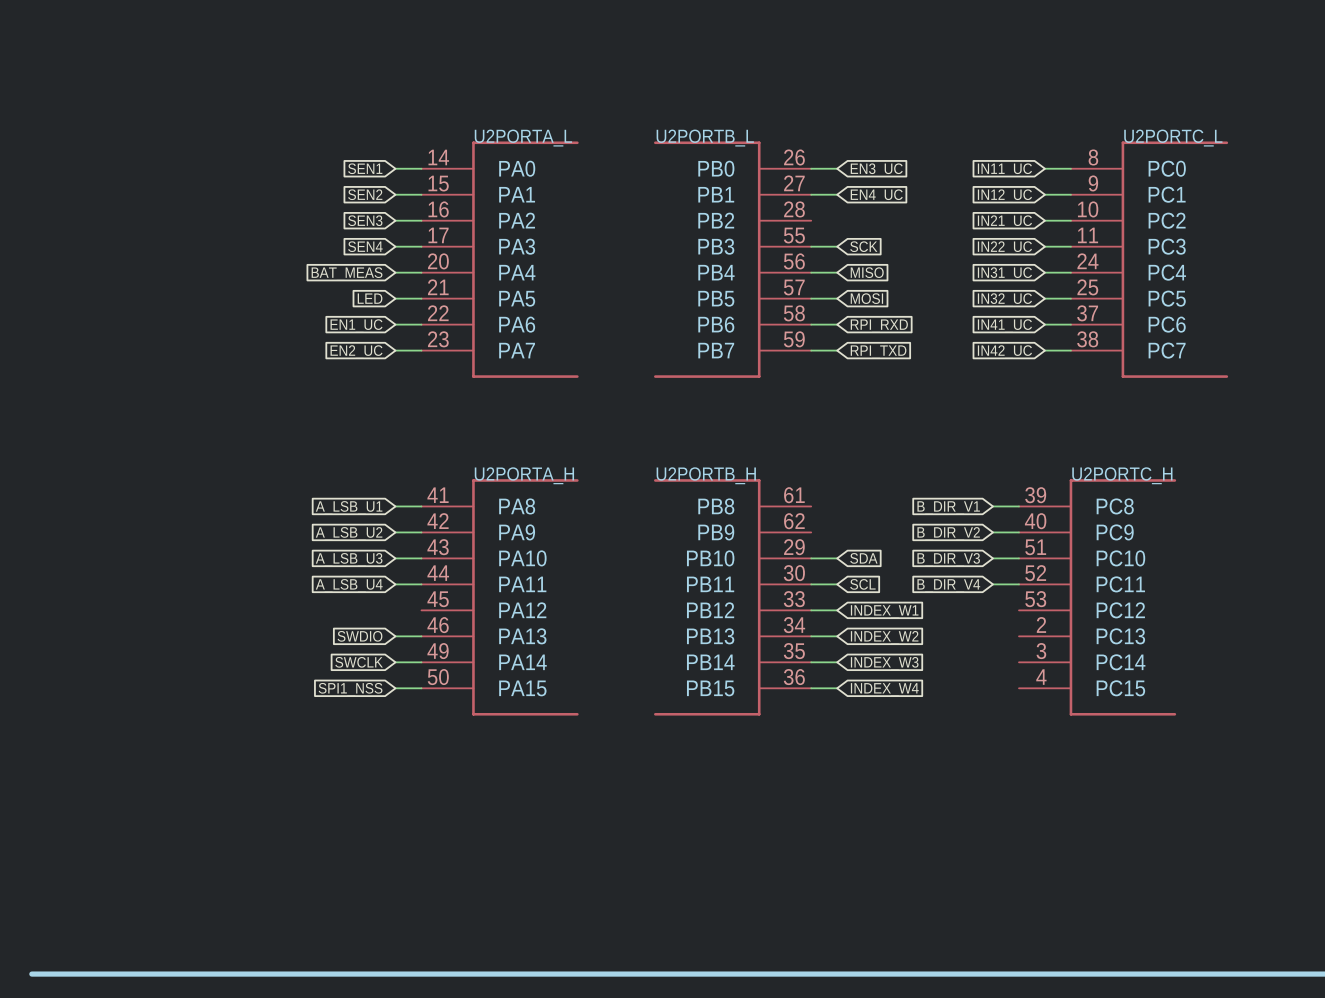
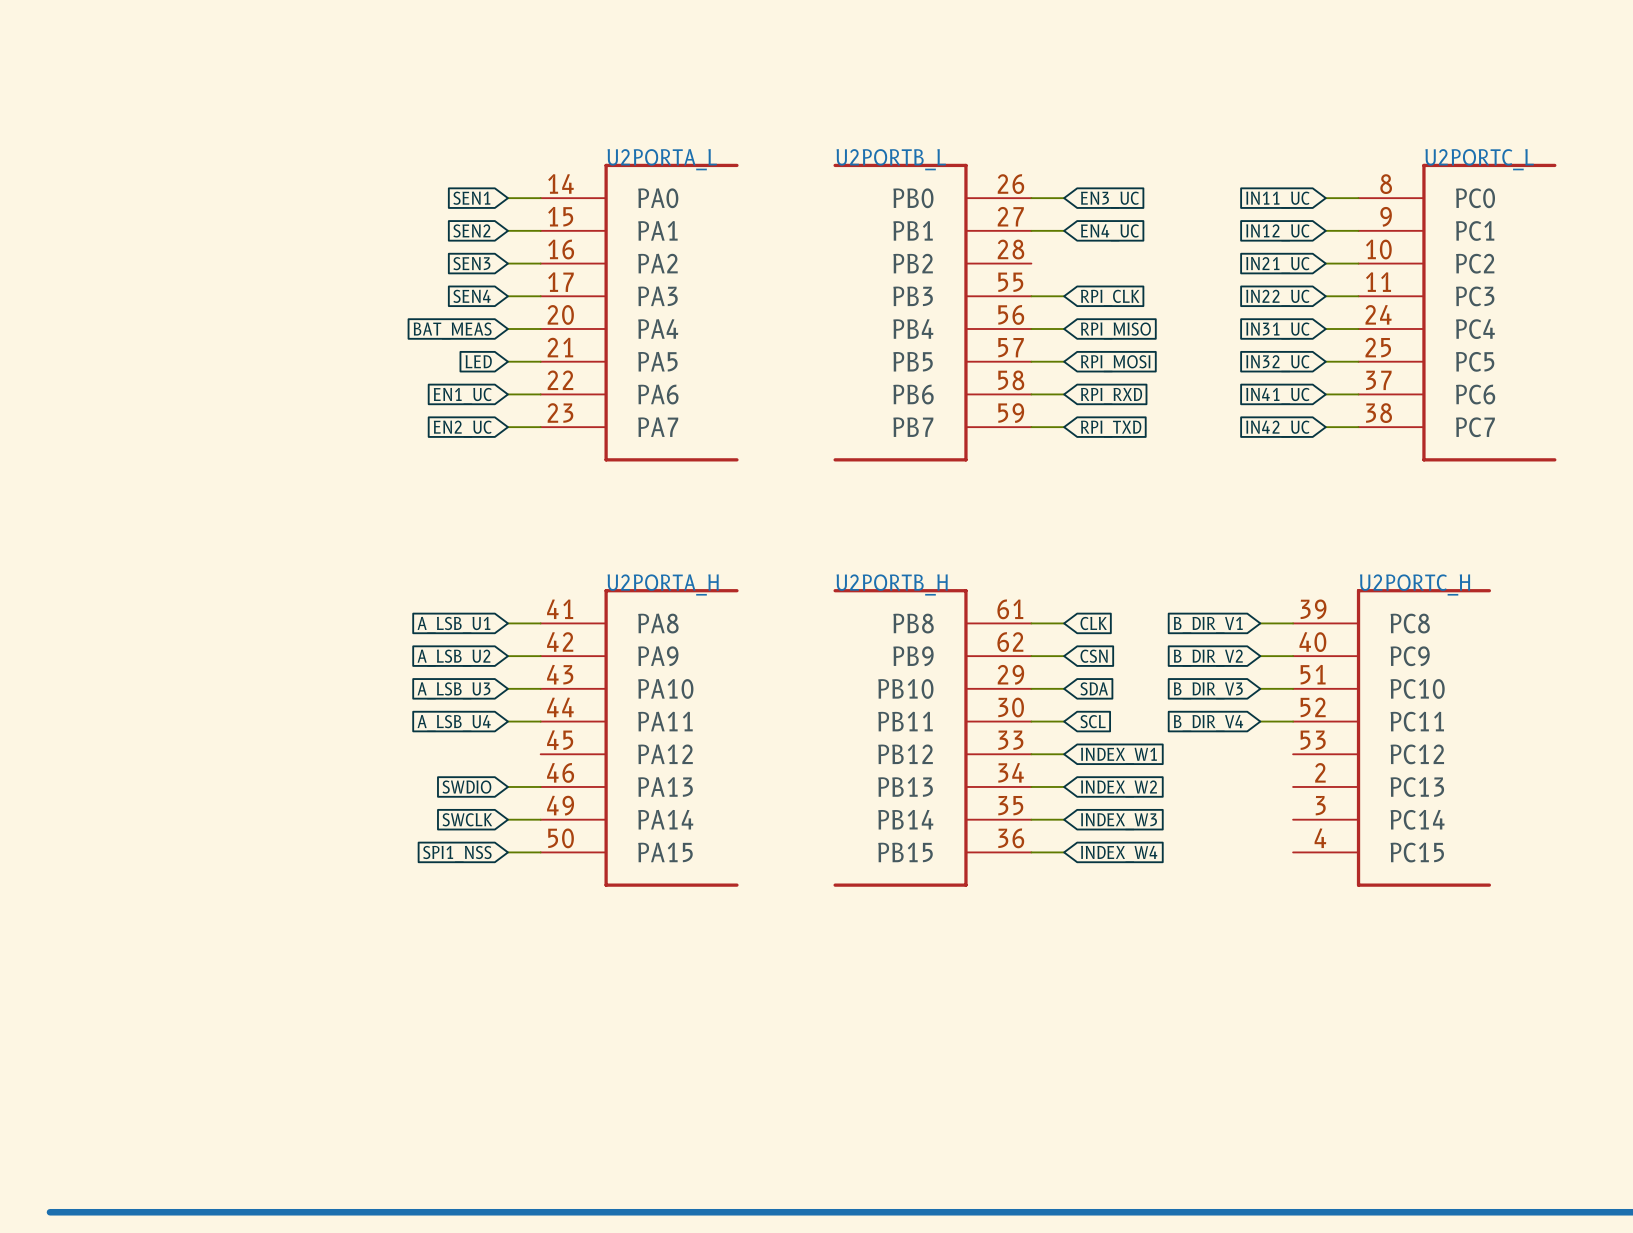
global label: SCK (863, 246) -> RPI_CLK (1110, 298)
global label: MISO (867, 272) -> RPI_MISO (1115, 330)
global label: MOSI (866, 298) -> RPI_MOSI (1115, 363)
wire: none -> (1031, 623) (1064, 623)
global label: none -> CLK (1093, 623)
wire: none -> (1031, 656) (1064, 656)
global label: none -> CSN (1094, 656)

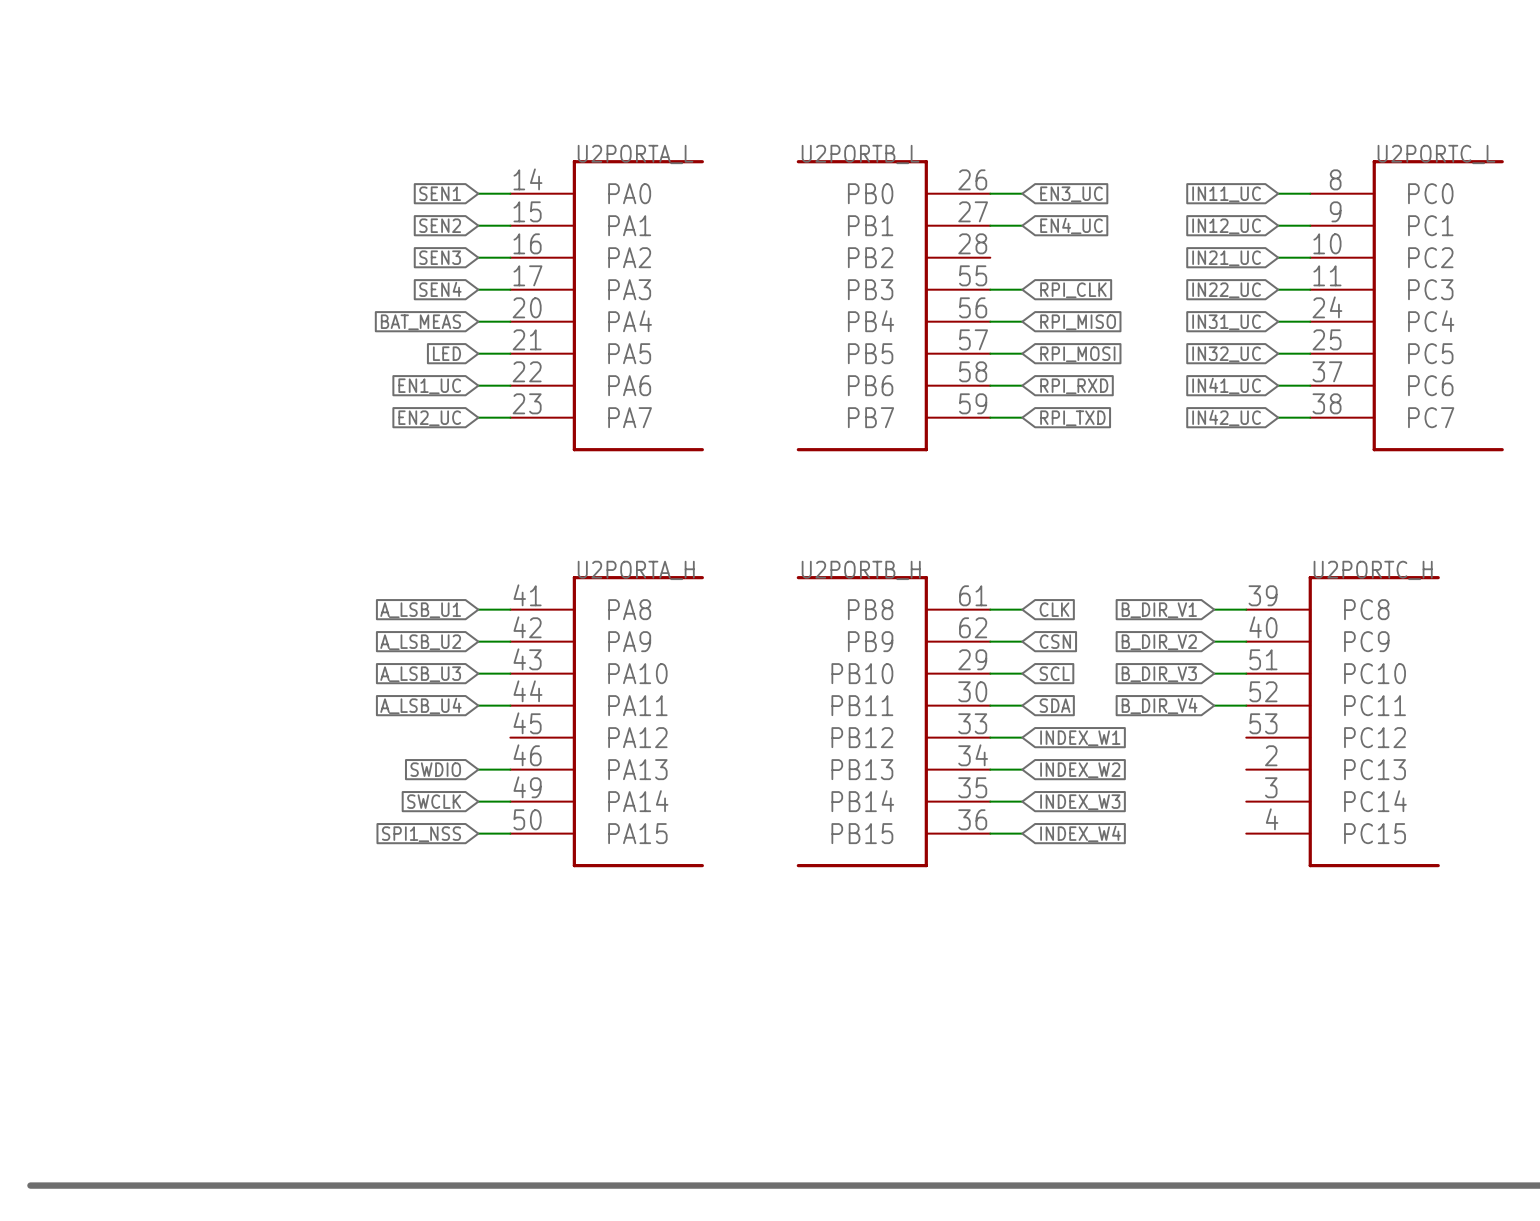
global label: SDA (1094, 688) -> SCL (1054, 673)
global label: SCL (1093, 721) -> SDA (1055, 705)

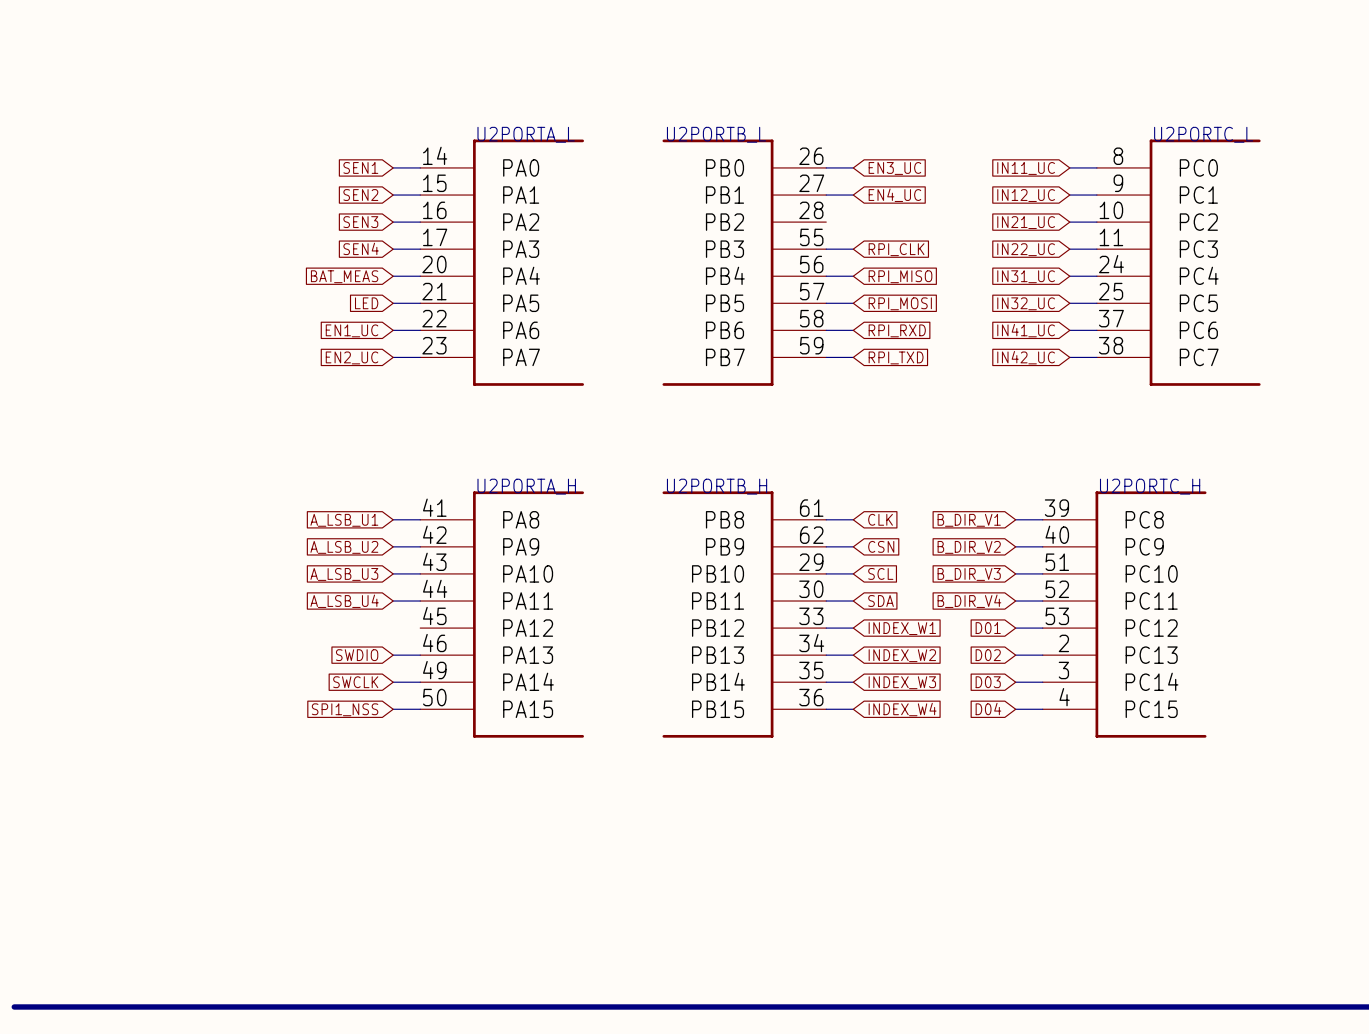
global label: none -> D01 (988, 628)
wire: none -> (1015, 628) (1042, 628)
global label: none -> D02 (988, 655)
wire: none -> (1015, 655) (1042, 655)
global label: none -> D03 (988, 682)
wire: none -> (1015, 682) (1042, 682)
global label: none -> D04 (988, 709)
wire: none -> (1015, 709) (1042, 709)

